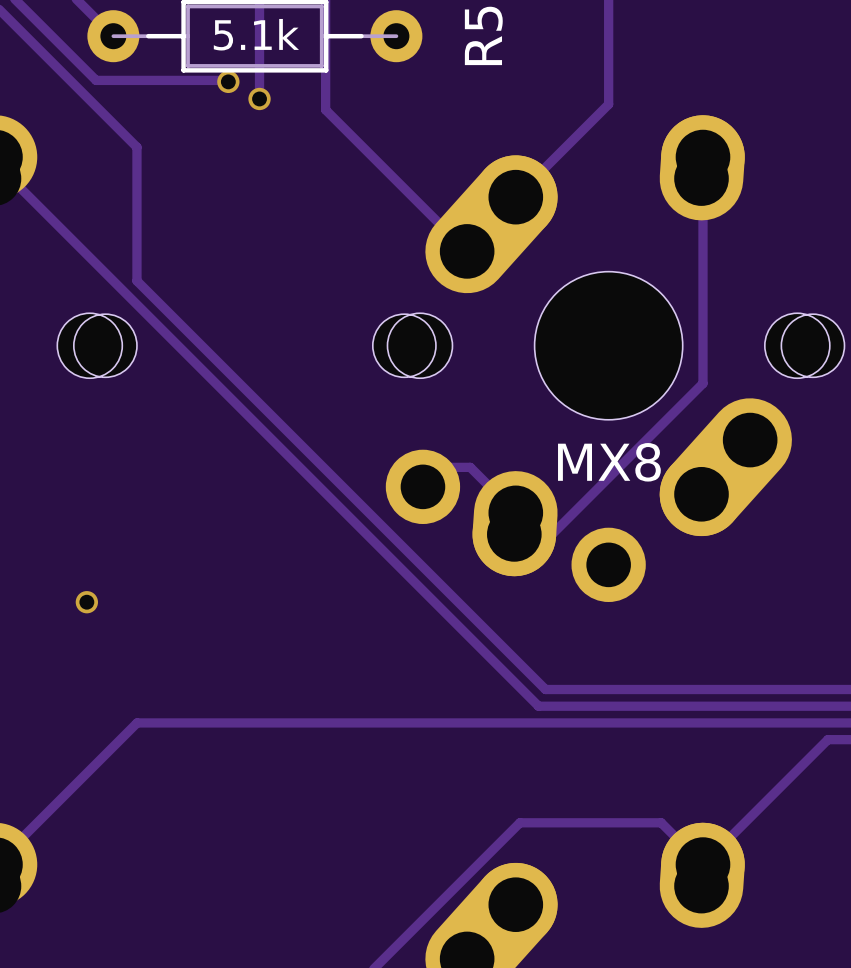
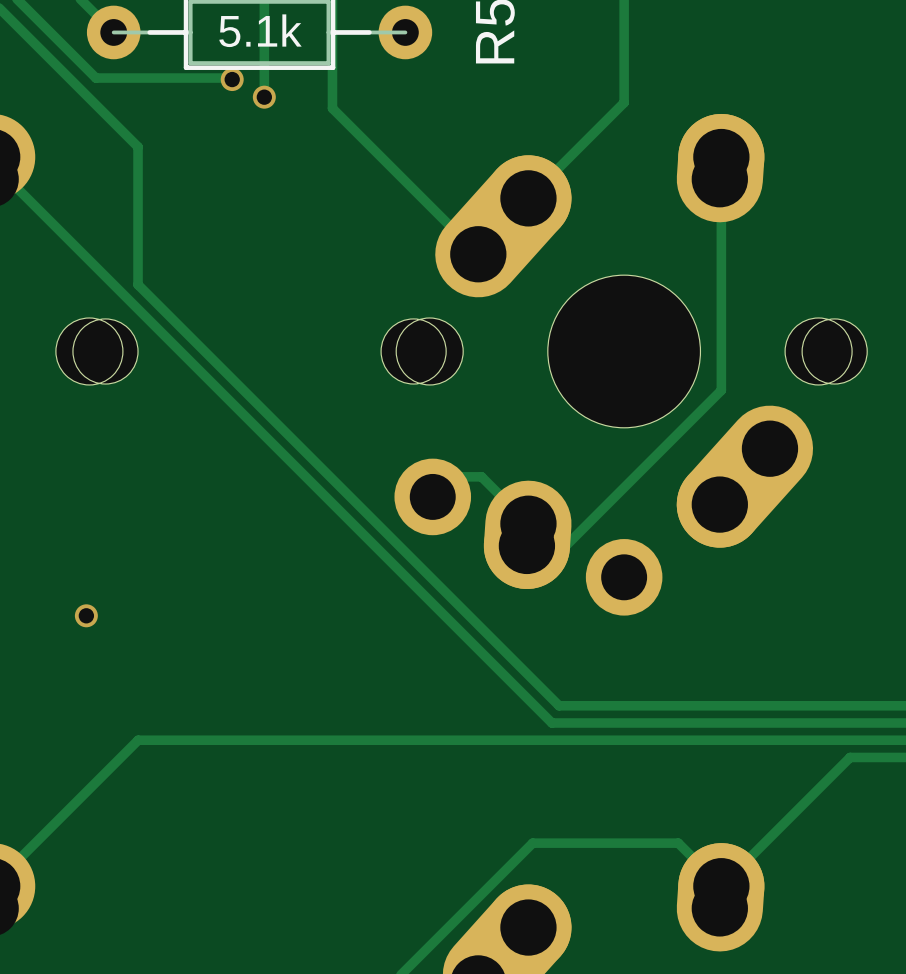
MX8 name: MX8 (609, 462) -> none

